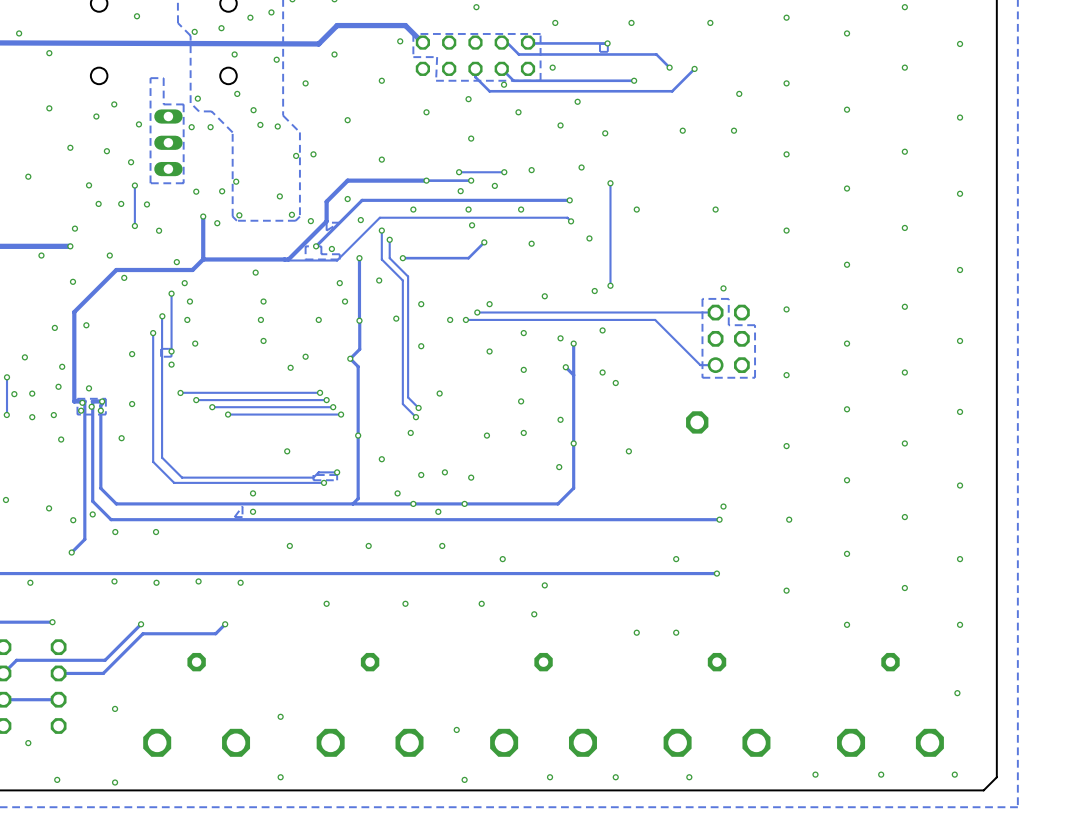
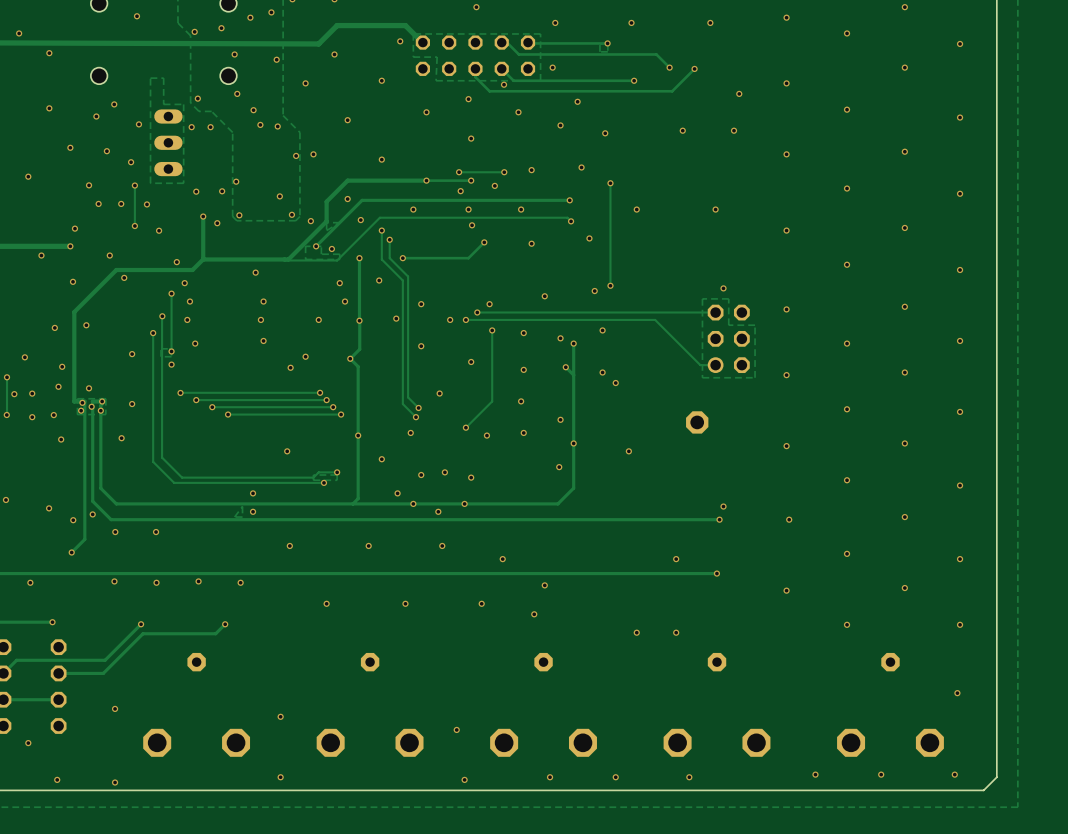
track: none -> (492, 330) (492, 401) (465, 427)
via: none -> (492, 330)
via: (489, 351) -> none
via: none -> (471, 361)
via: none -> (465, 427)

